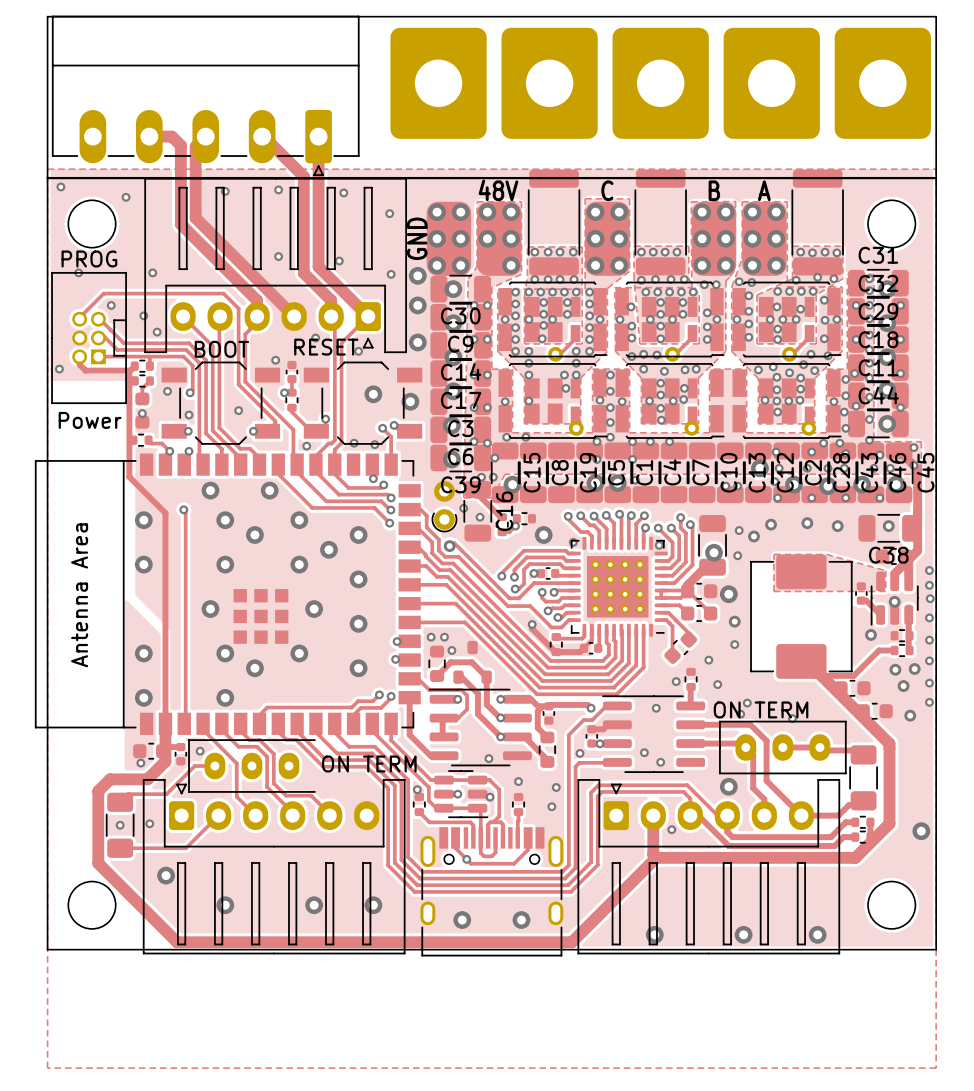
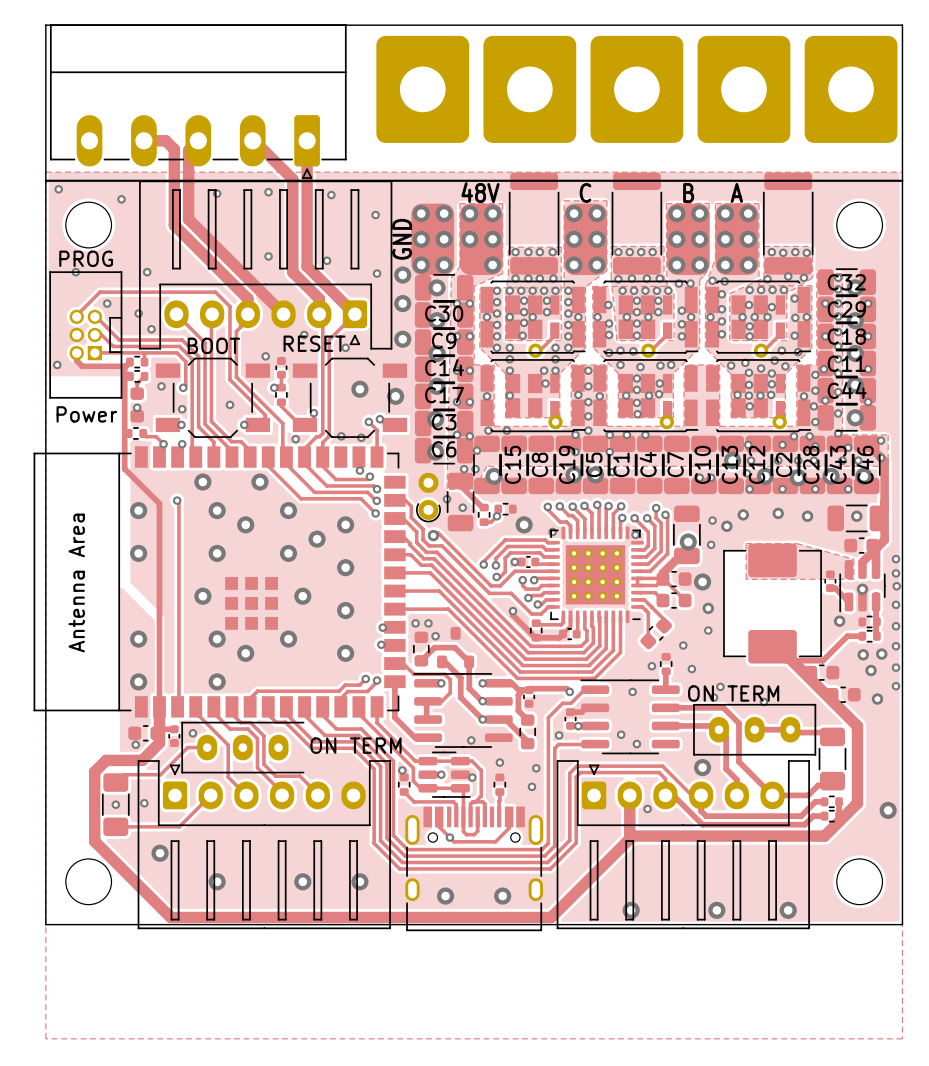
C31 name: C31 (878, 255) -> none
C45 name: C45 (925, 472) -> none
C39 name: C39 (460, 484) -> none
C16 name: C16 (504, 511) -> none
C38 name: C38 (888, 555) -> none

